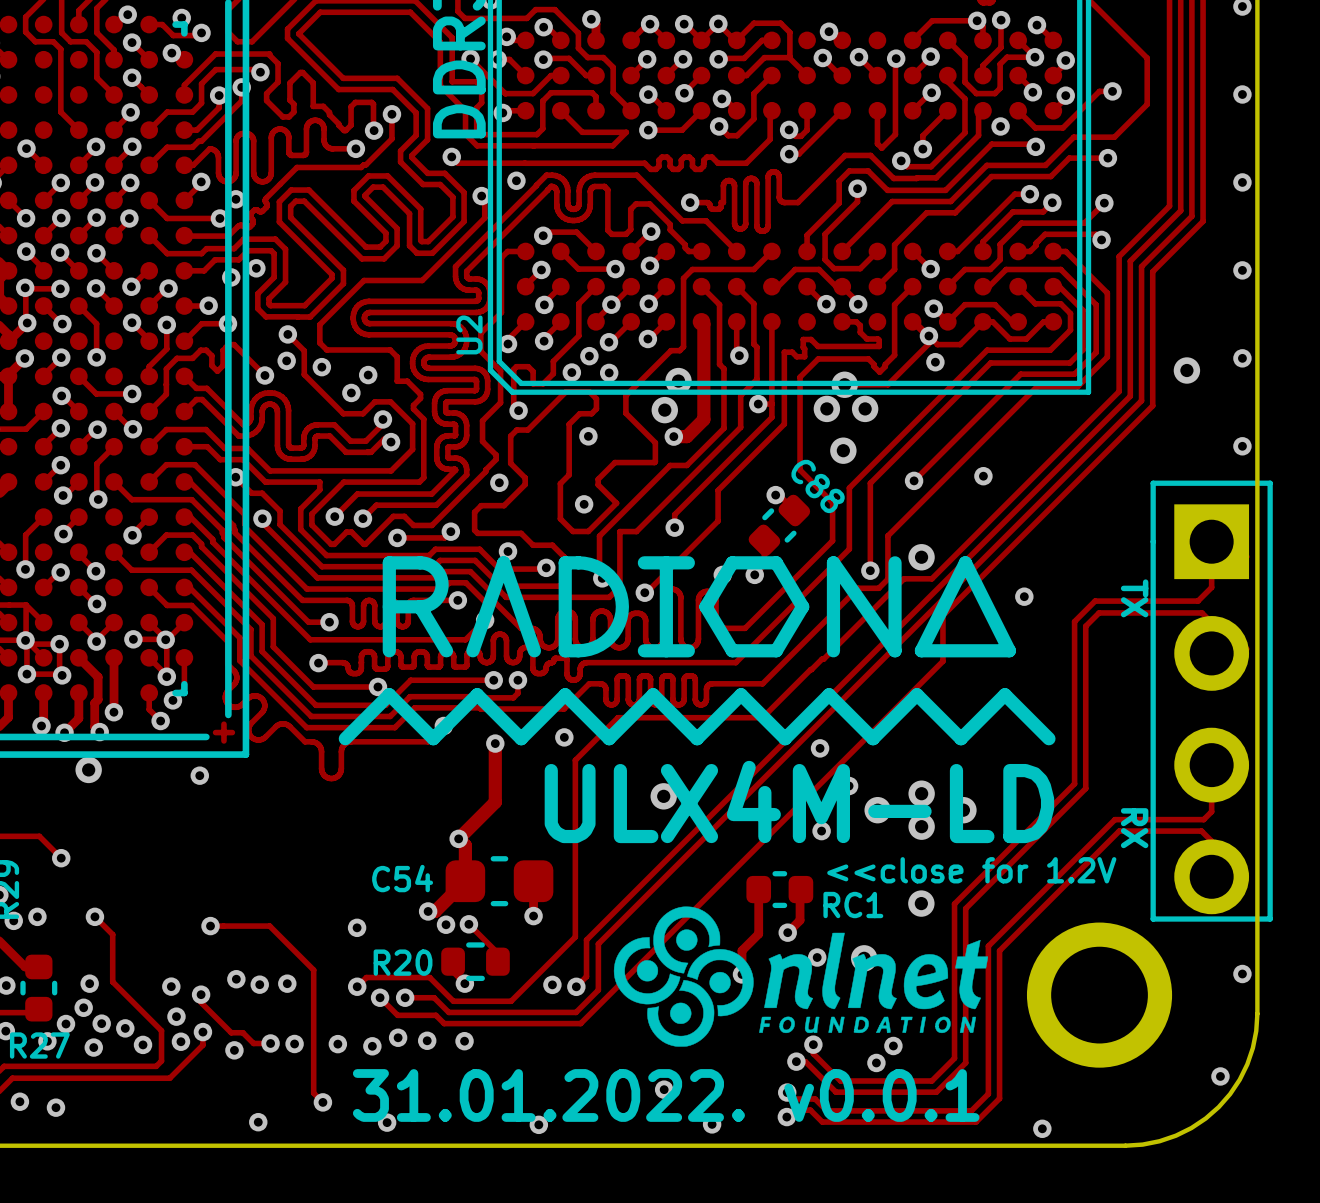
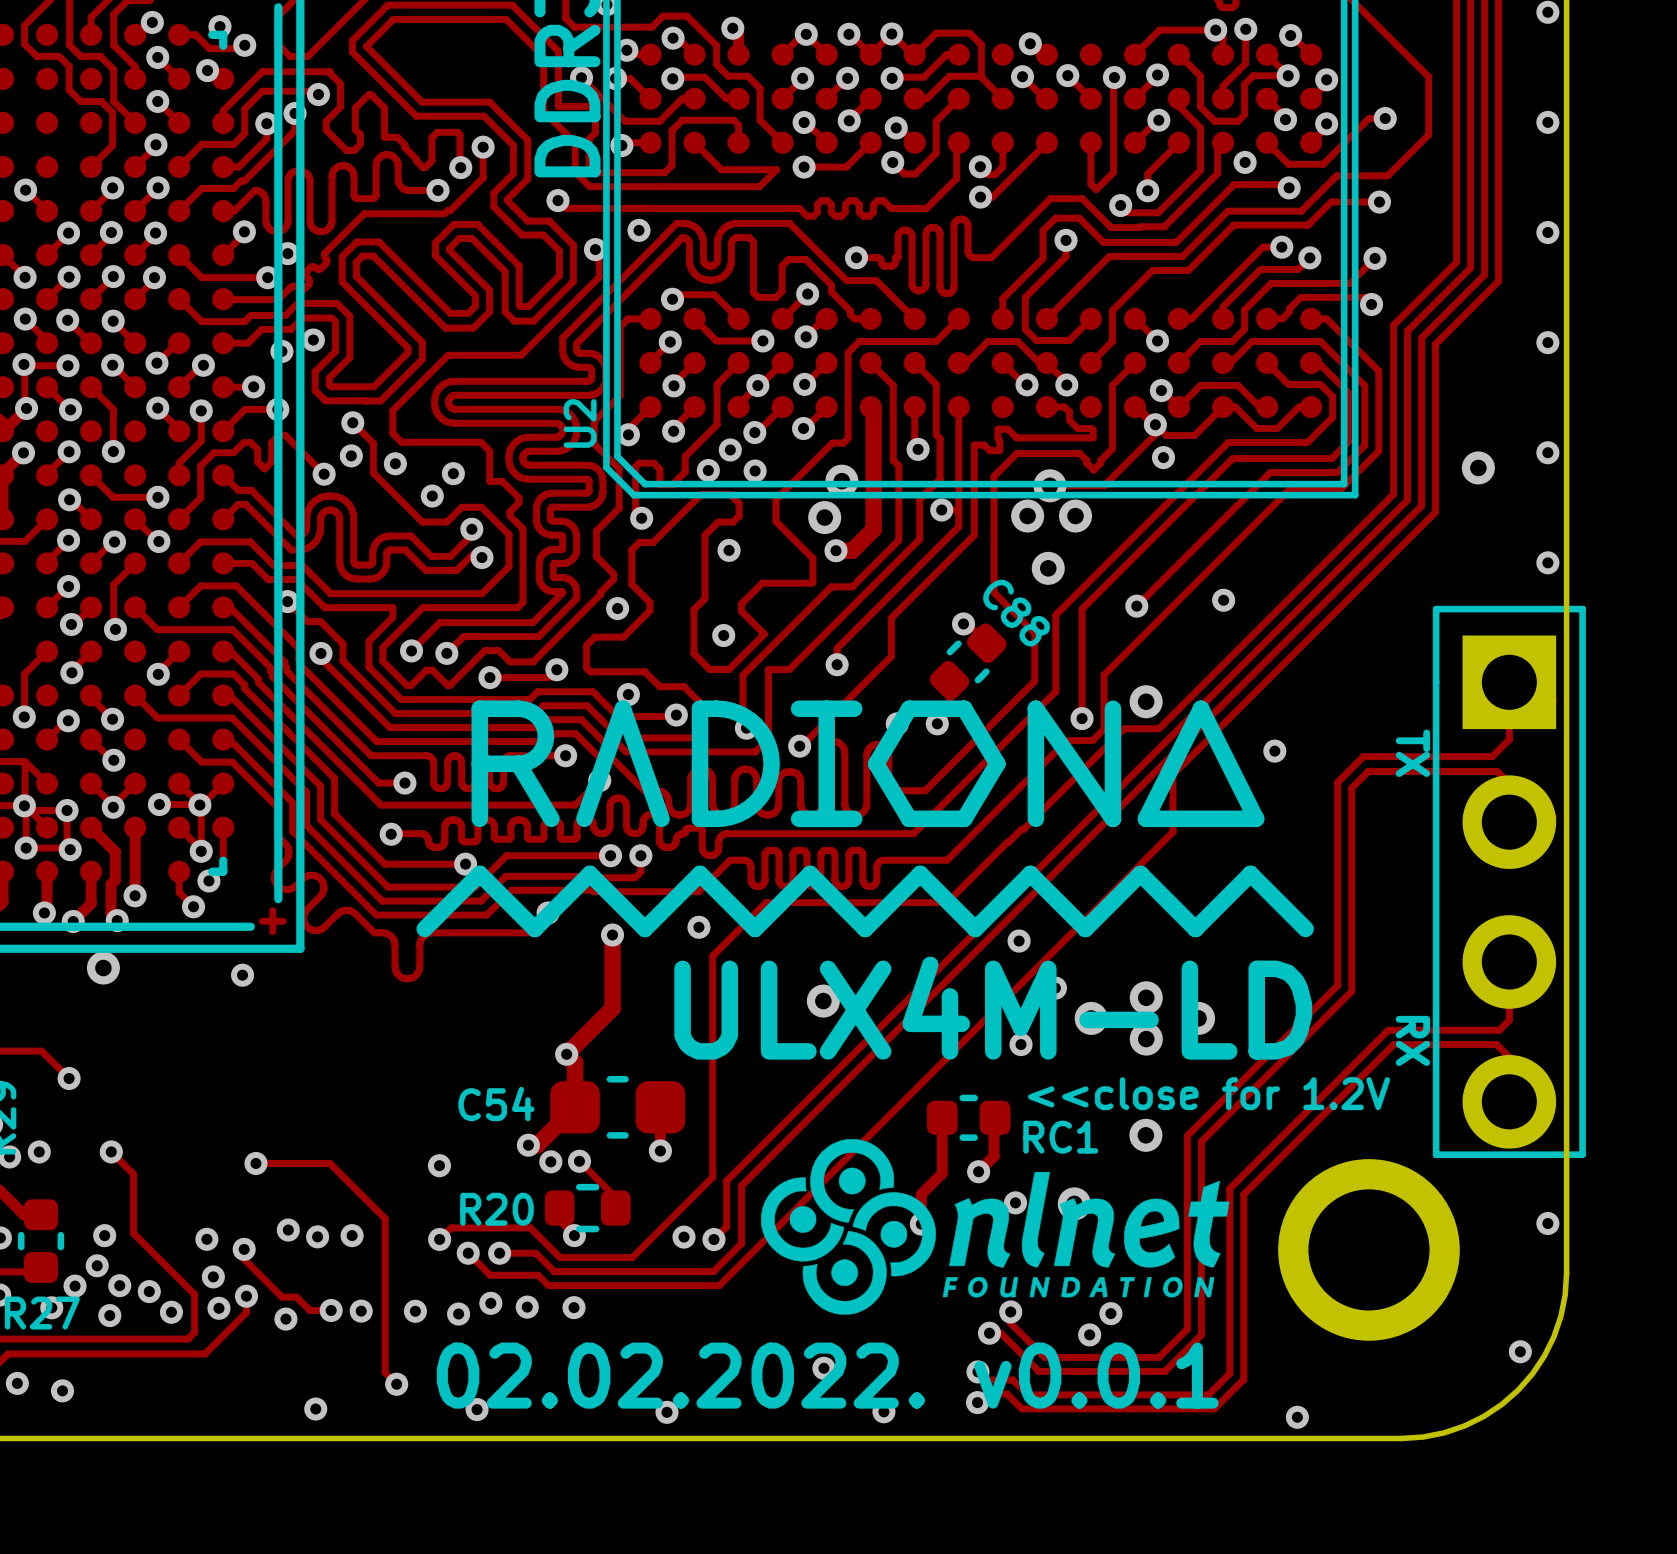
track: (60, 49) (60, 112) (78, 130) -> (69, 66) (69, 89) (80, 101) (101, 101) (112, 112) (112, 145) (91, 166)
text: 31.01.2022. v0.0.1 (666, 1095) -> 02.02.2022. v0.0.1 (827, 1375)

